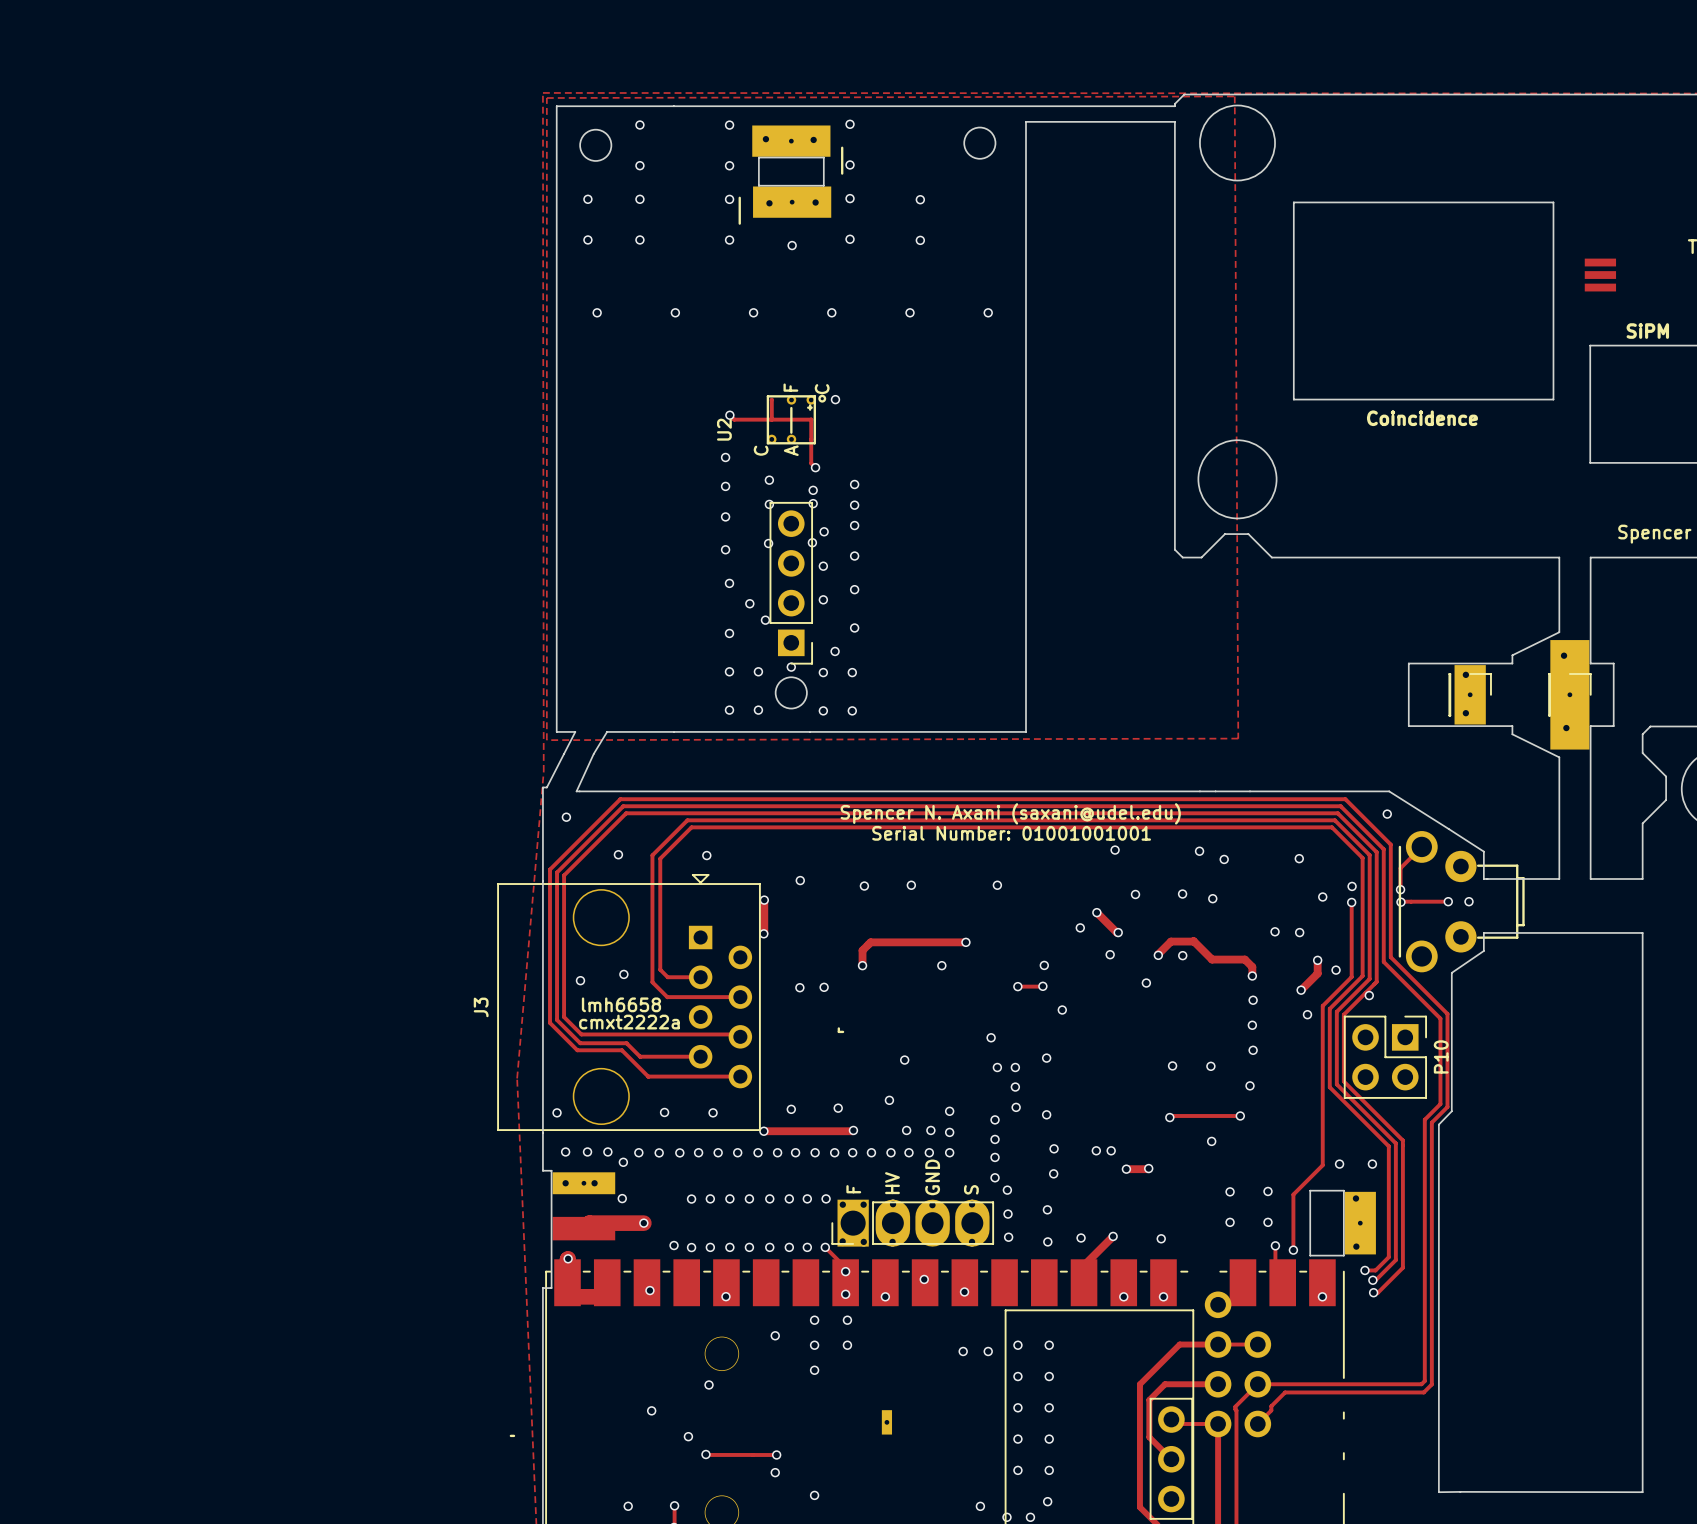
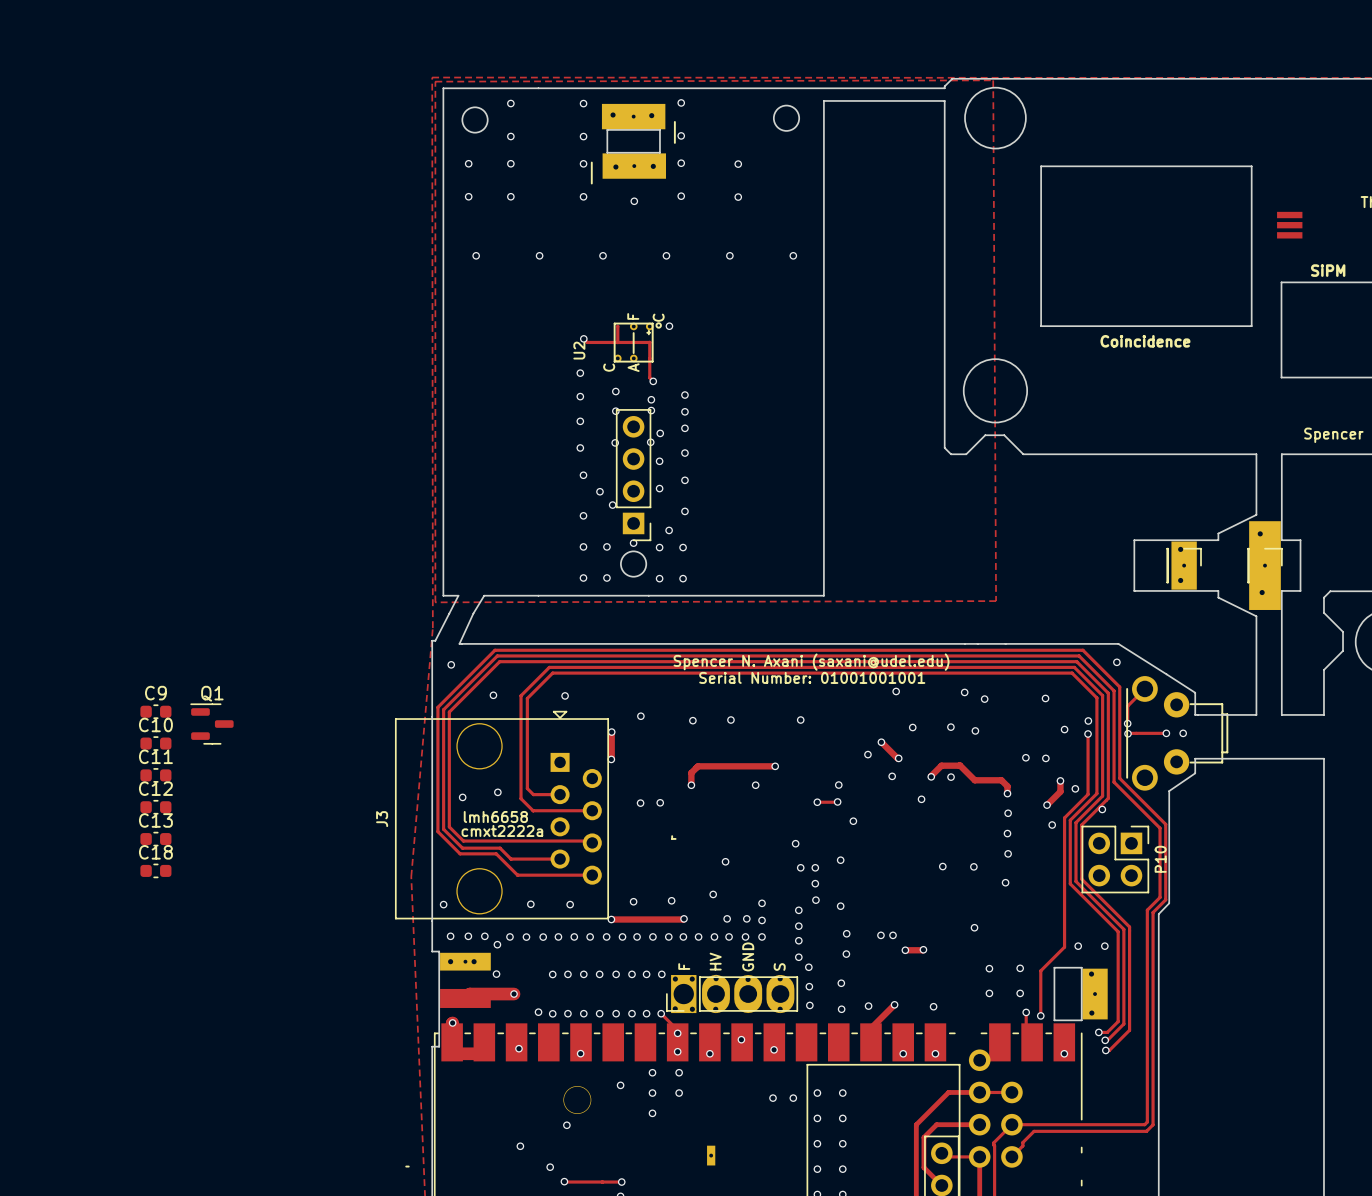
C9: none -> (155, 711)
Q1: none -> (211, 724)
C10: none -> (155, 743)
C11: none -> (155, 775)
C12: none -> (155, 807)
C13: none -> (155, 839)
C18: none -> (155, 870)
track: (1240, 1115) (1171, 1115) (1169, 1117) -> none
via: (1240, 1115) -> none
via: (1169, 1117) -> none

